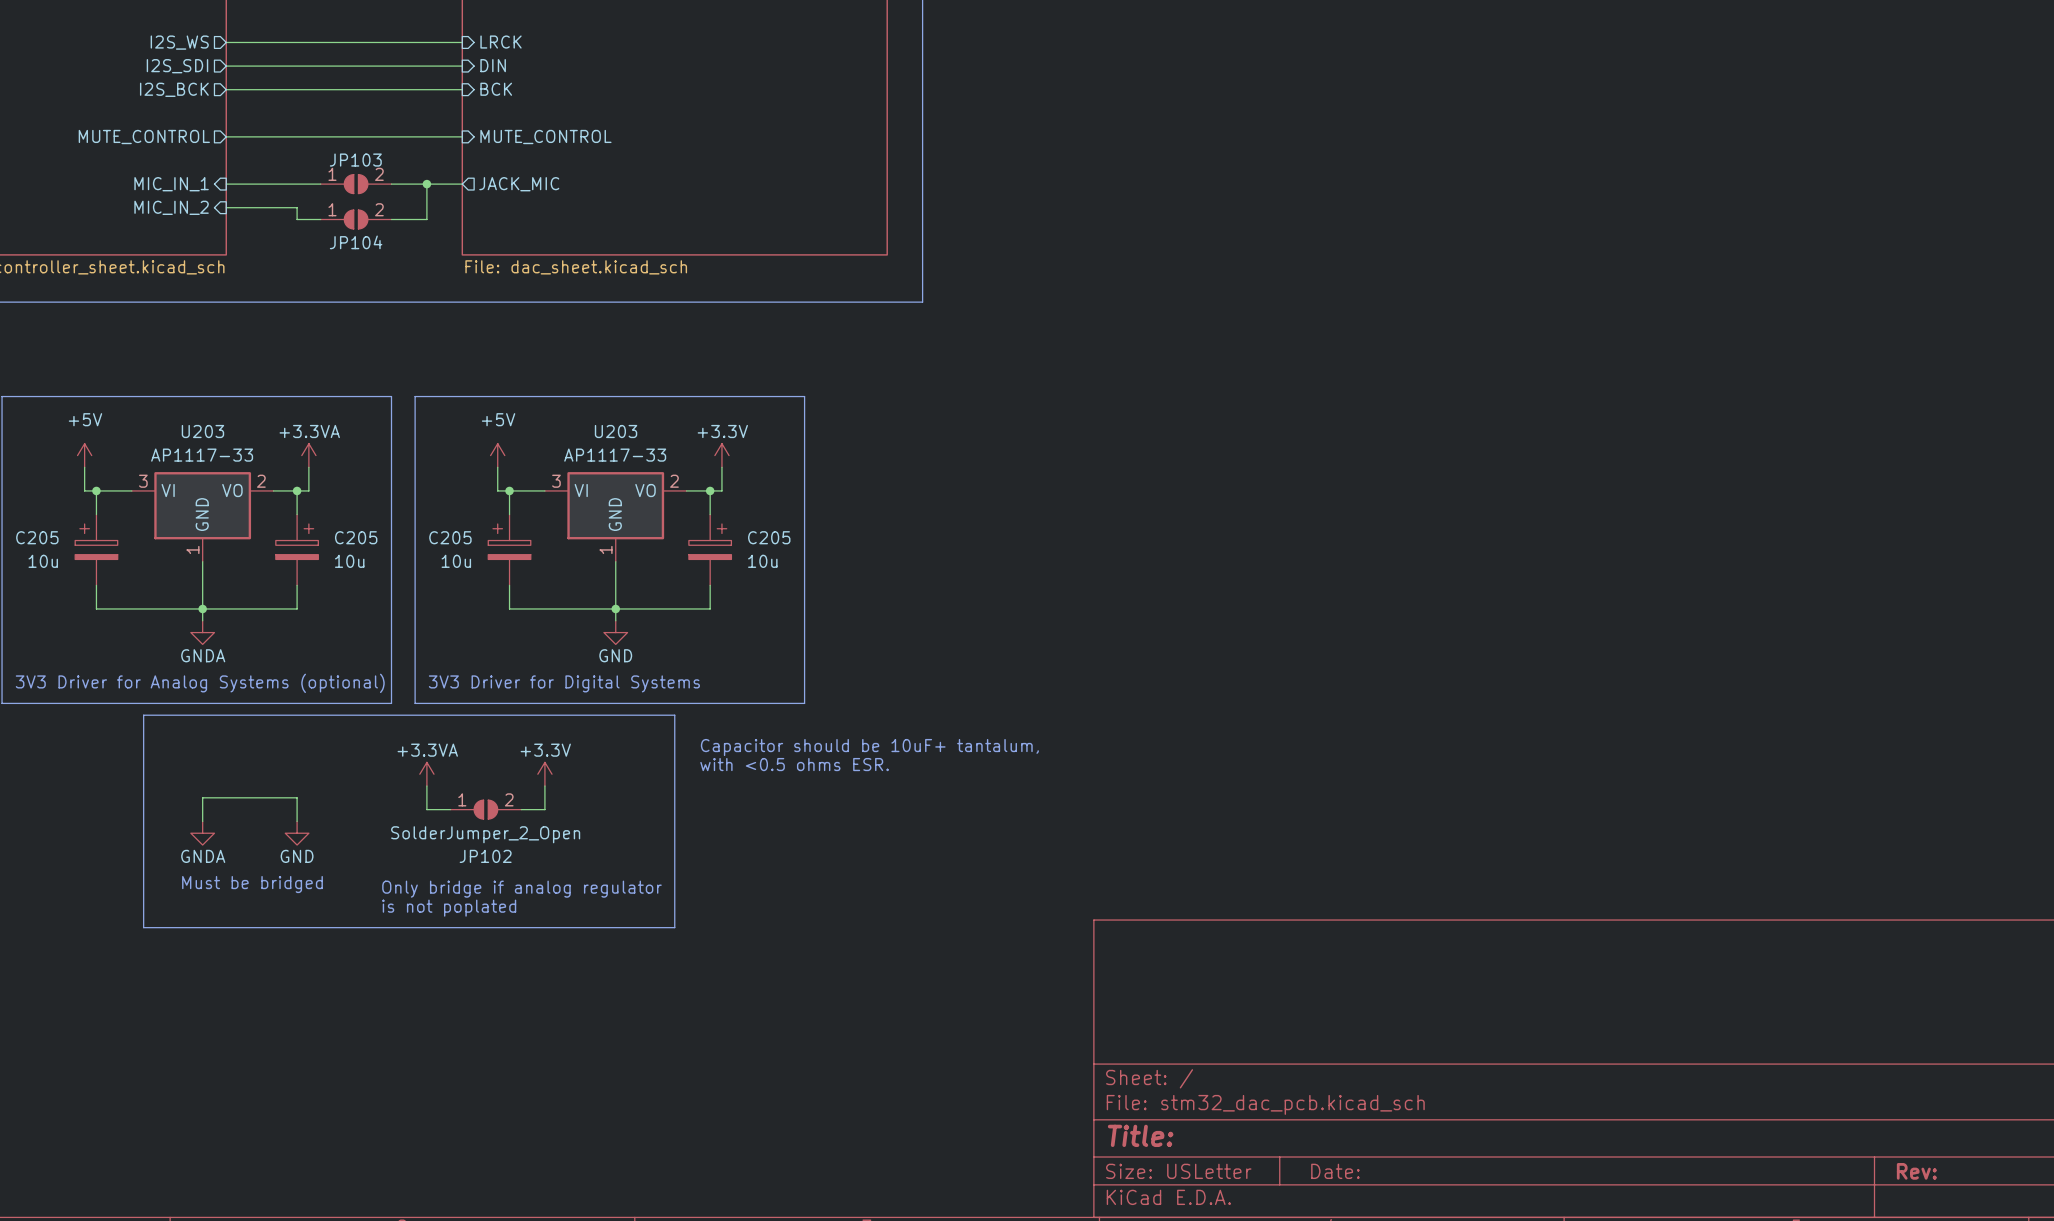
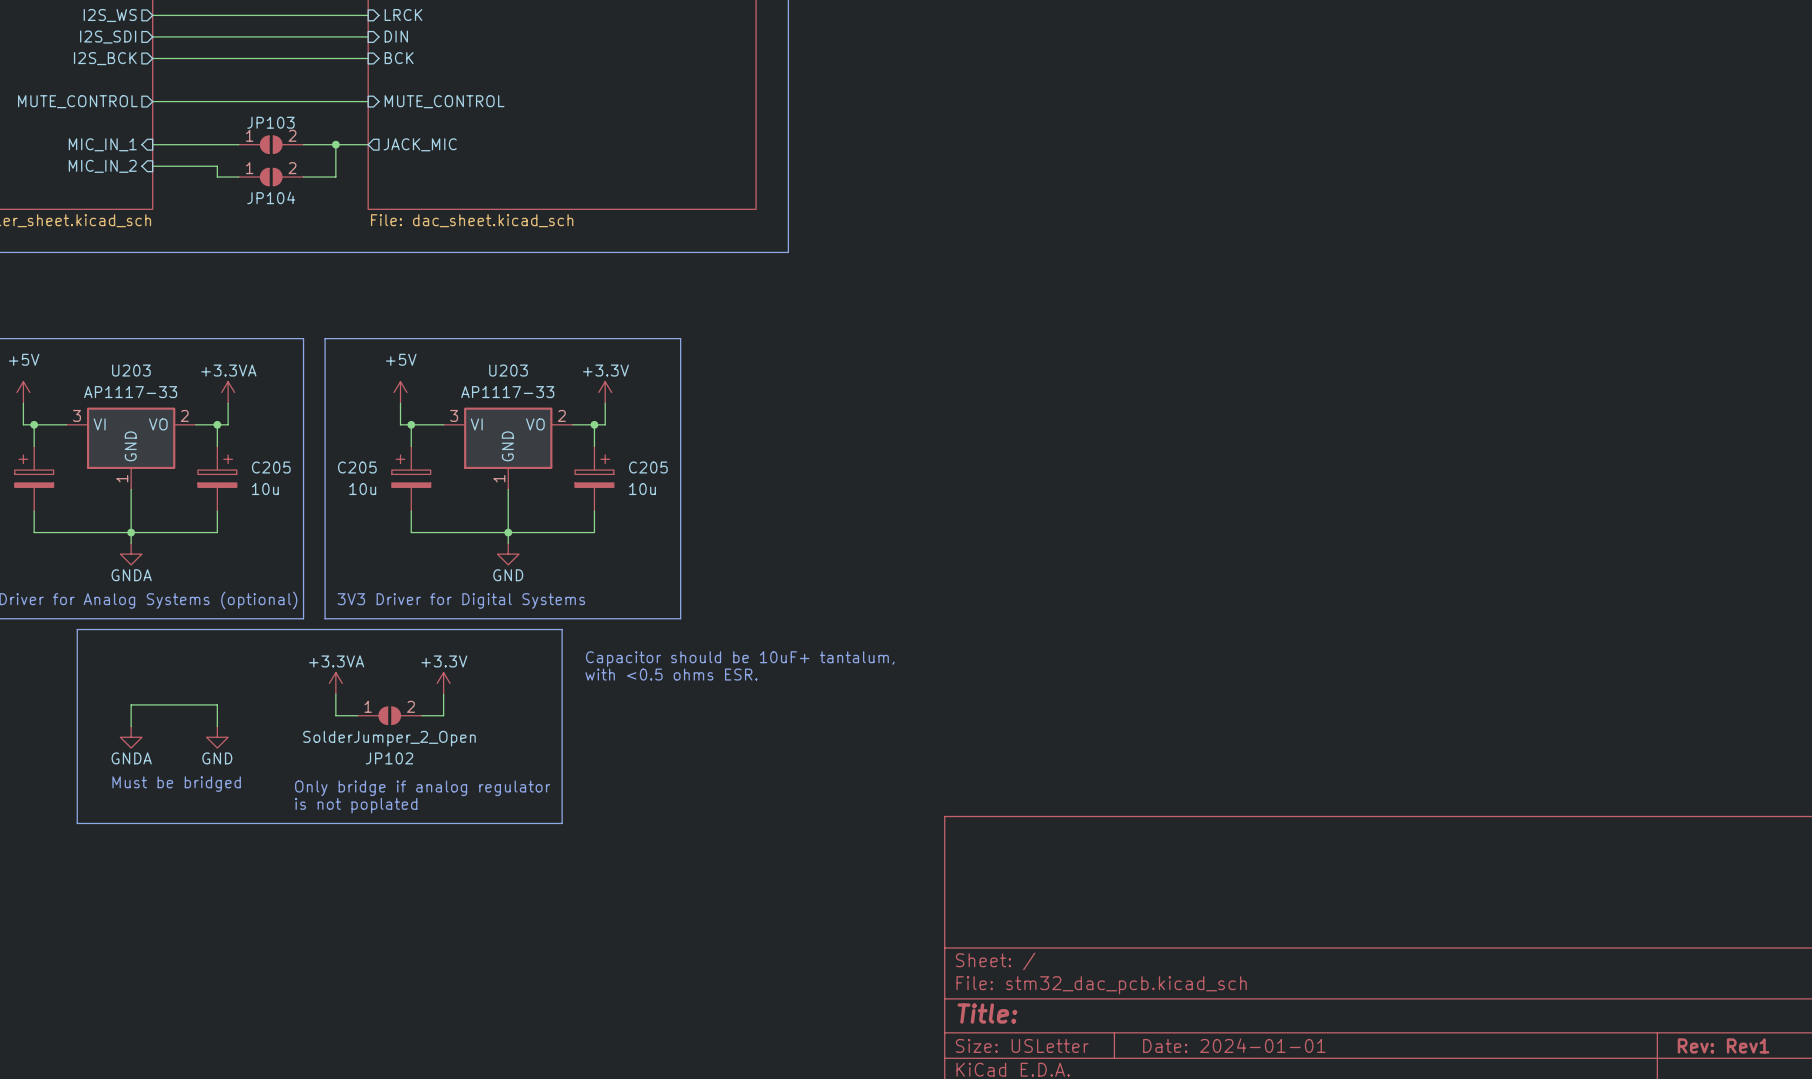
title block: Date: (1335, 1171) -> Date: 2024-01-01 (1234, 1045)
title block: Rev: (1916, 1171) -> Rev: Rev1 (1723, 1045)

